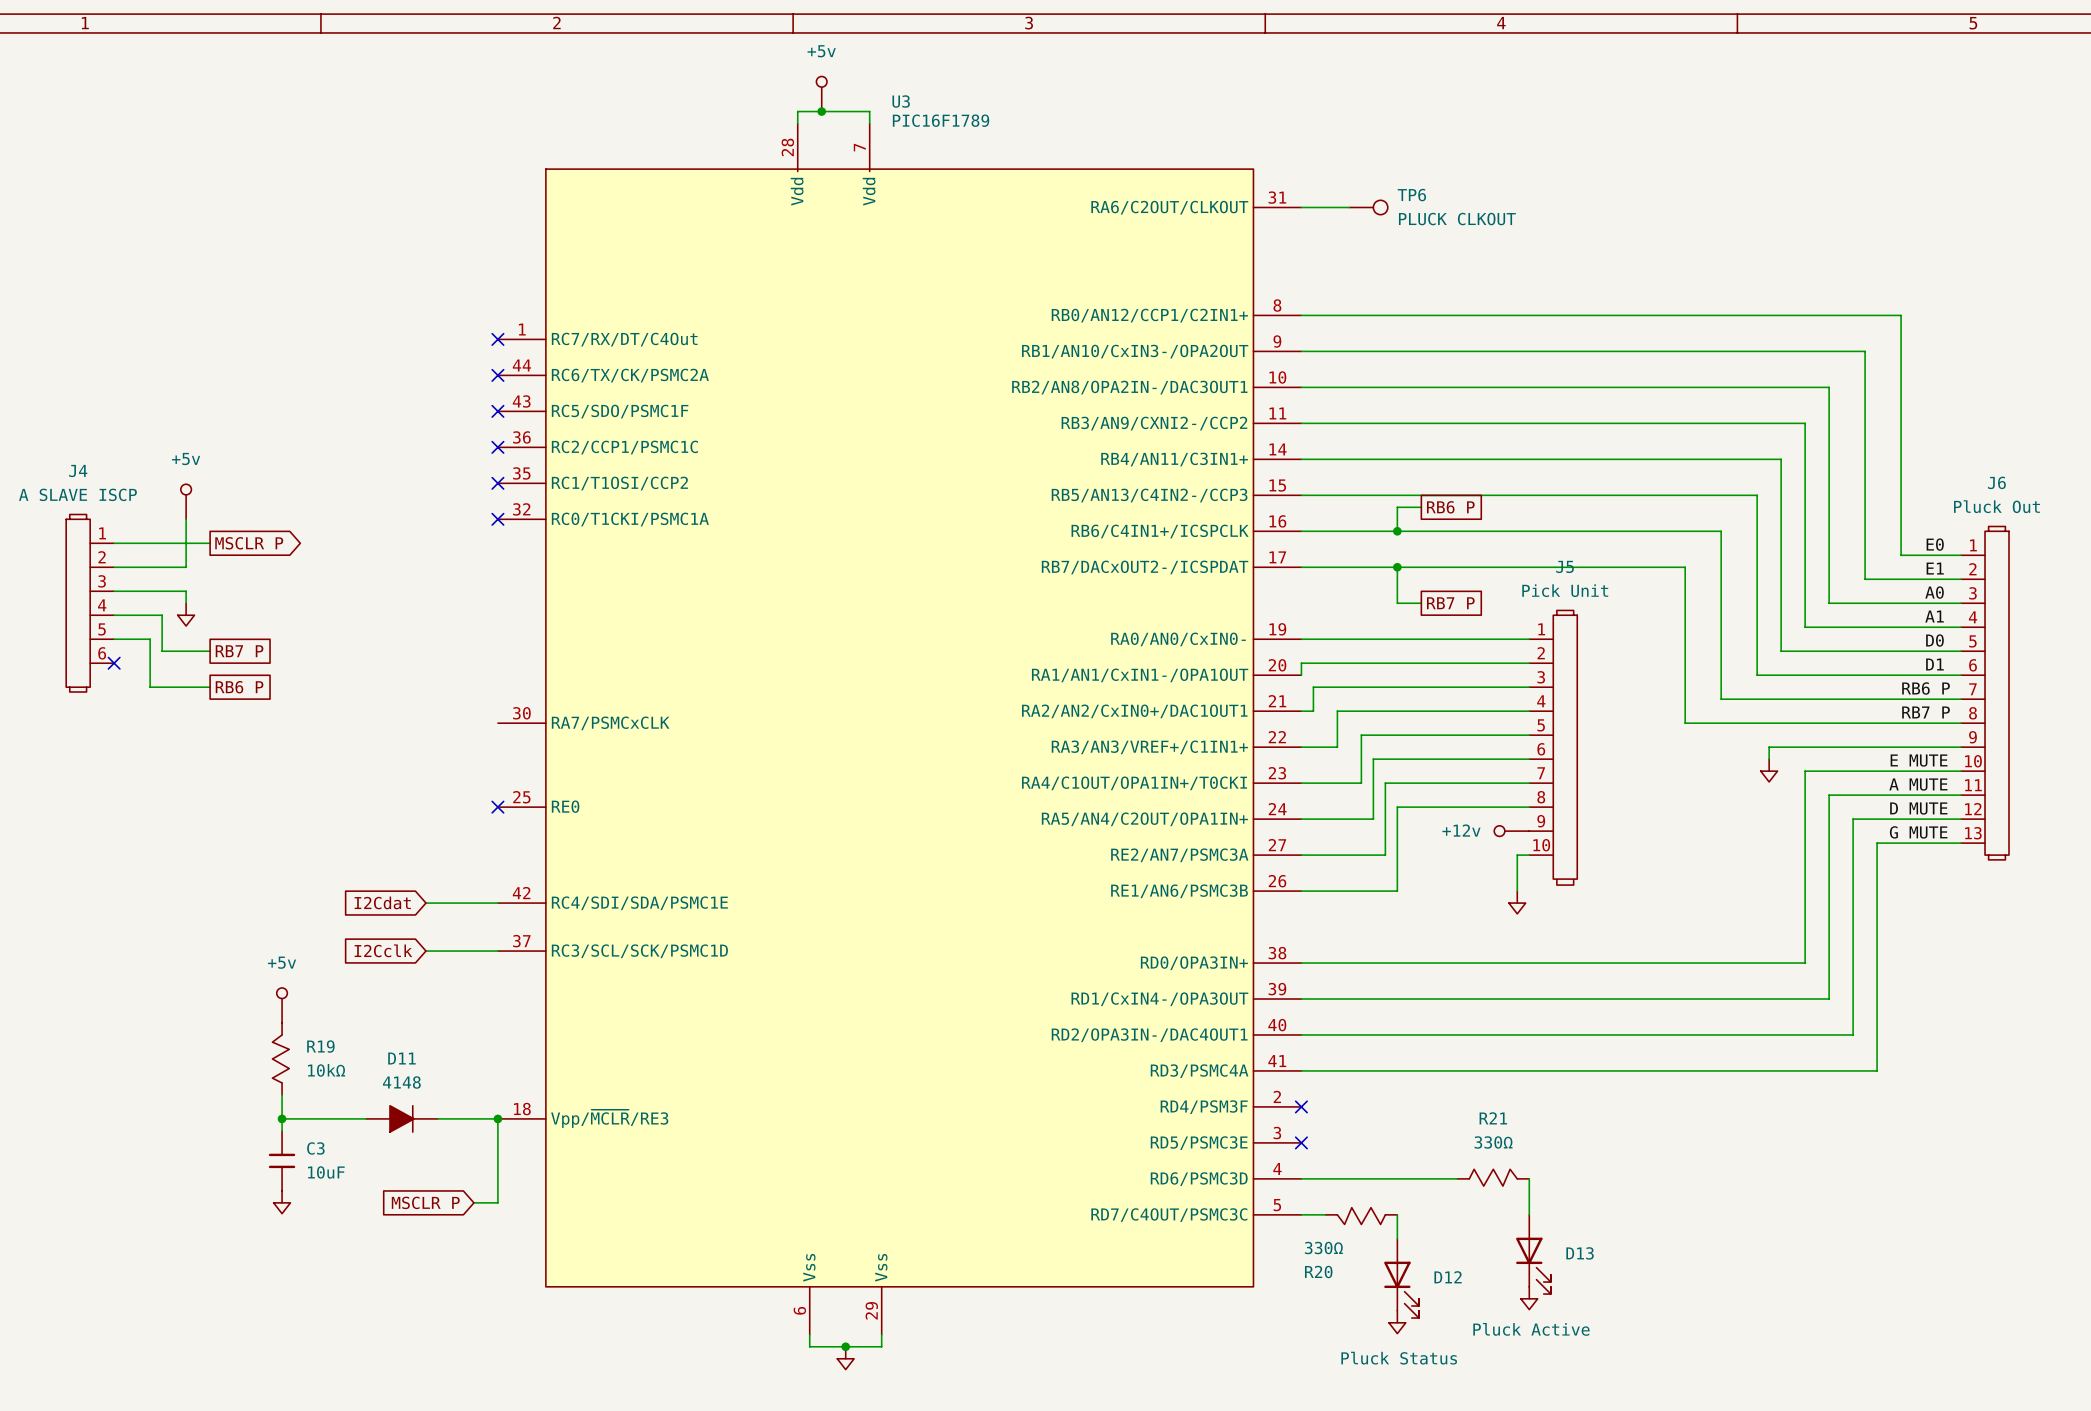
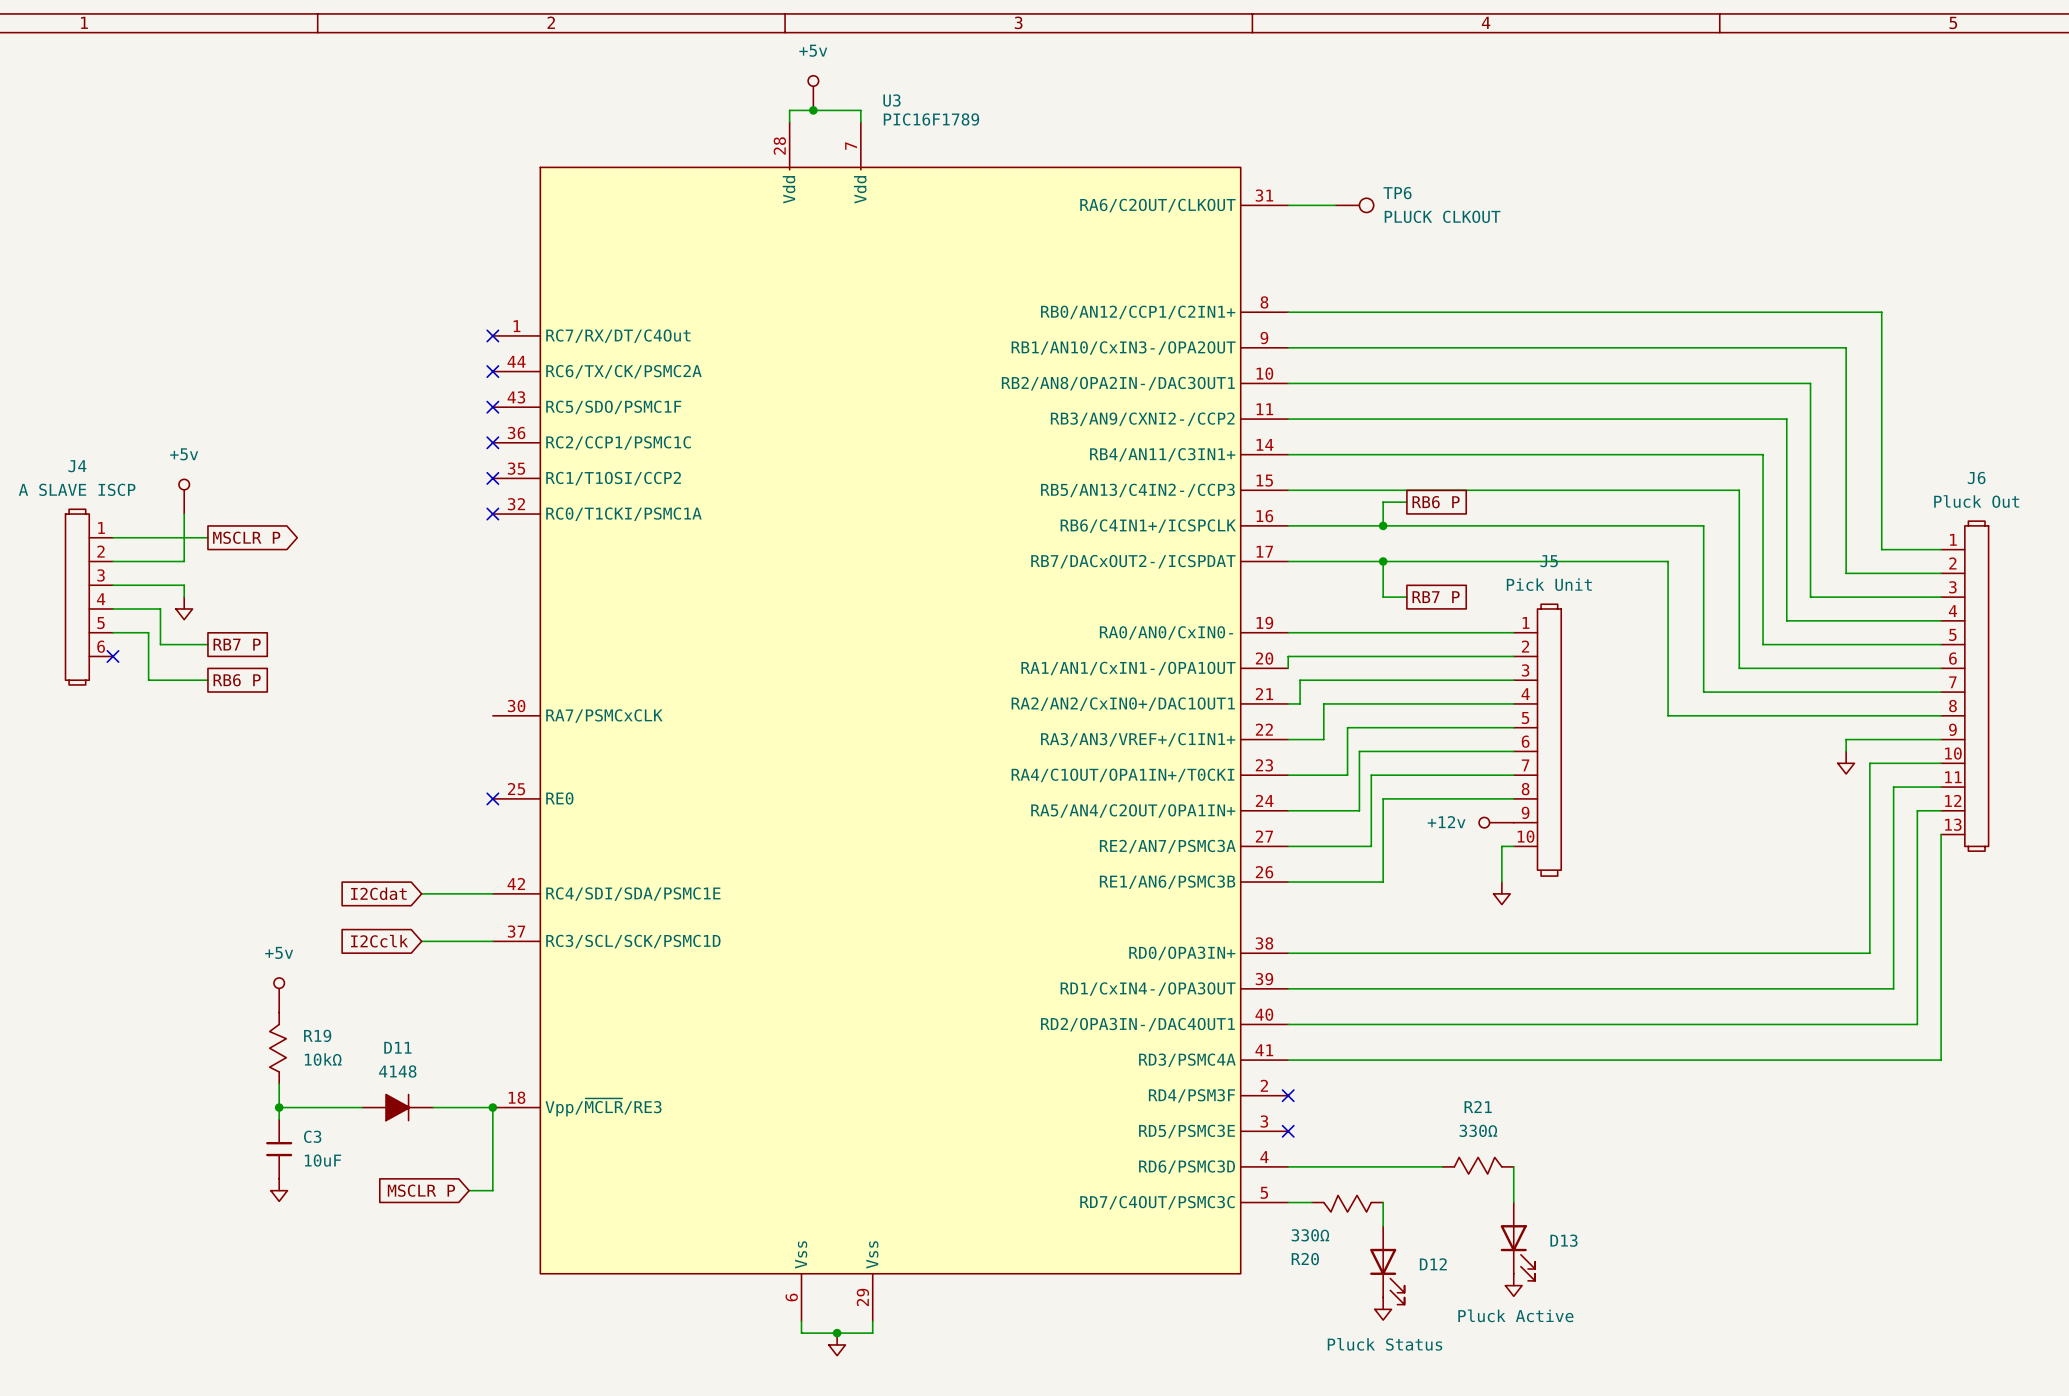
label: E0 (1935, 544) -> none
label: E1 (1935, 568) -> none
label: A0 (1934, 592) -> none
label: A1 (1934, 616) -> none
label: D0 (1934, 640) -> none
label: D1 (1934, 664) -> none
label: RB6 P (1926, 688) -> none
label: RB7 P (1926, 712) -> none
wire: (1865, 747) (1769, 747) (1769, 759) -> (1846, 739) (1846, 751)
label: E MUTE (1919, 760) -> none
power symbol position: (1769, 770) -> (1846, 762)
wire: (1889, 771) (1805, 771) (1805, 963) -> (1869, 763) (1869, 953) (1786, 953)
label: A MUTE (1918, 784) -> none
wire: (1913, 795) (1829, 795) (1829, 999) -> (1893, 787) (1893, 988) (1810, 988)
label: D MUTE (1918, 808) -> none
wire: (1937, 819) (1853, 819) (1853, 1034) -> (1917, 810) (1917, 1024) (1834, 1024)
label: G MUTE (1918, 832) -> none
wire: (1961, 843) (1877, 843) (1877, 1070) -> (1941, 834) (1941, 1060) (1858, 1060)

